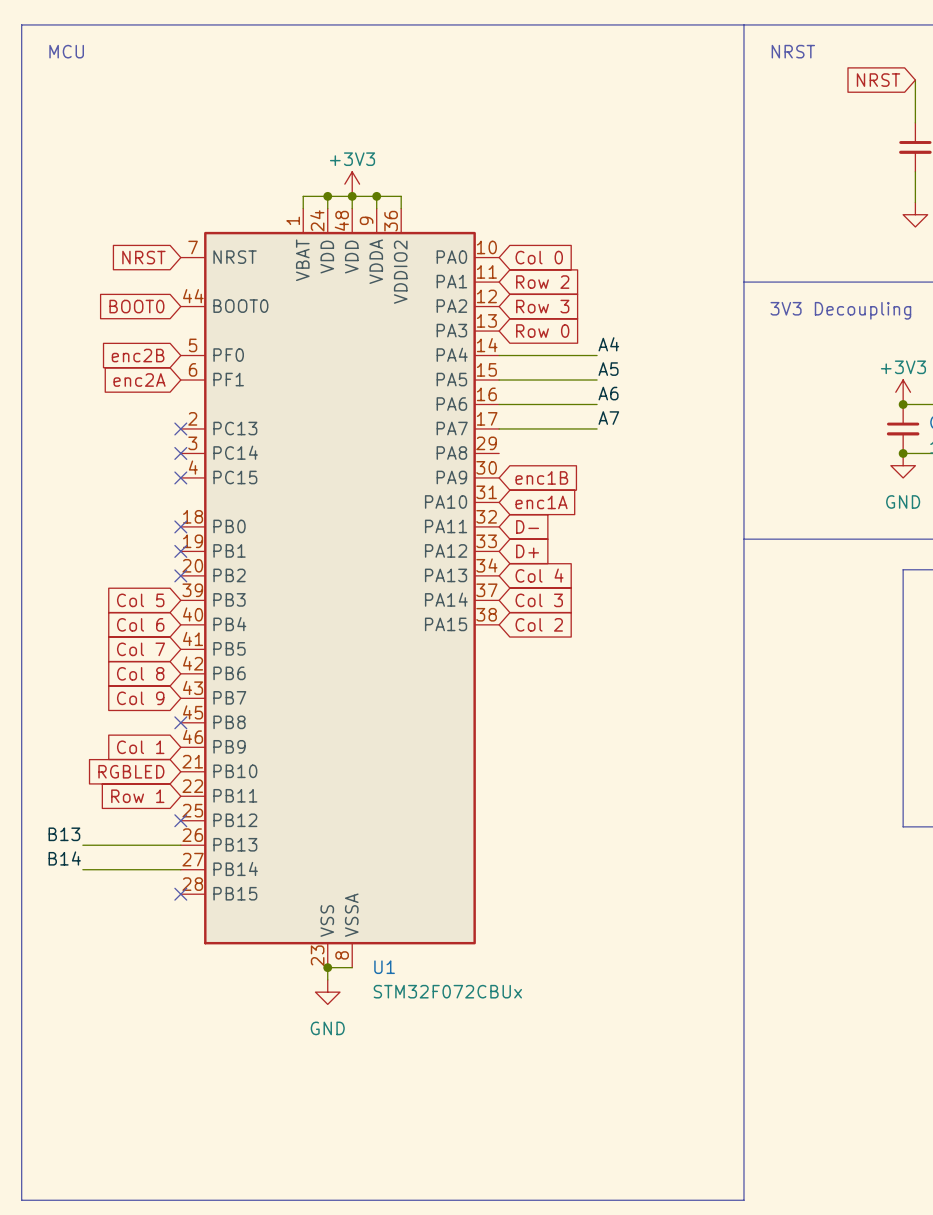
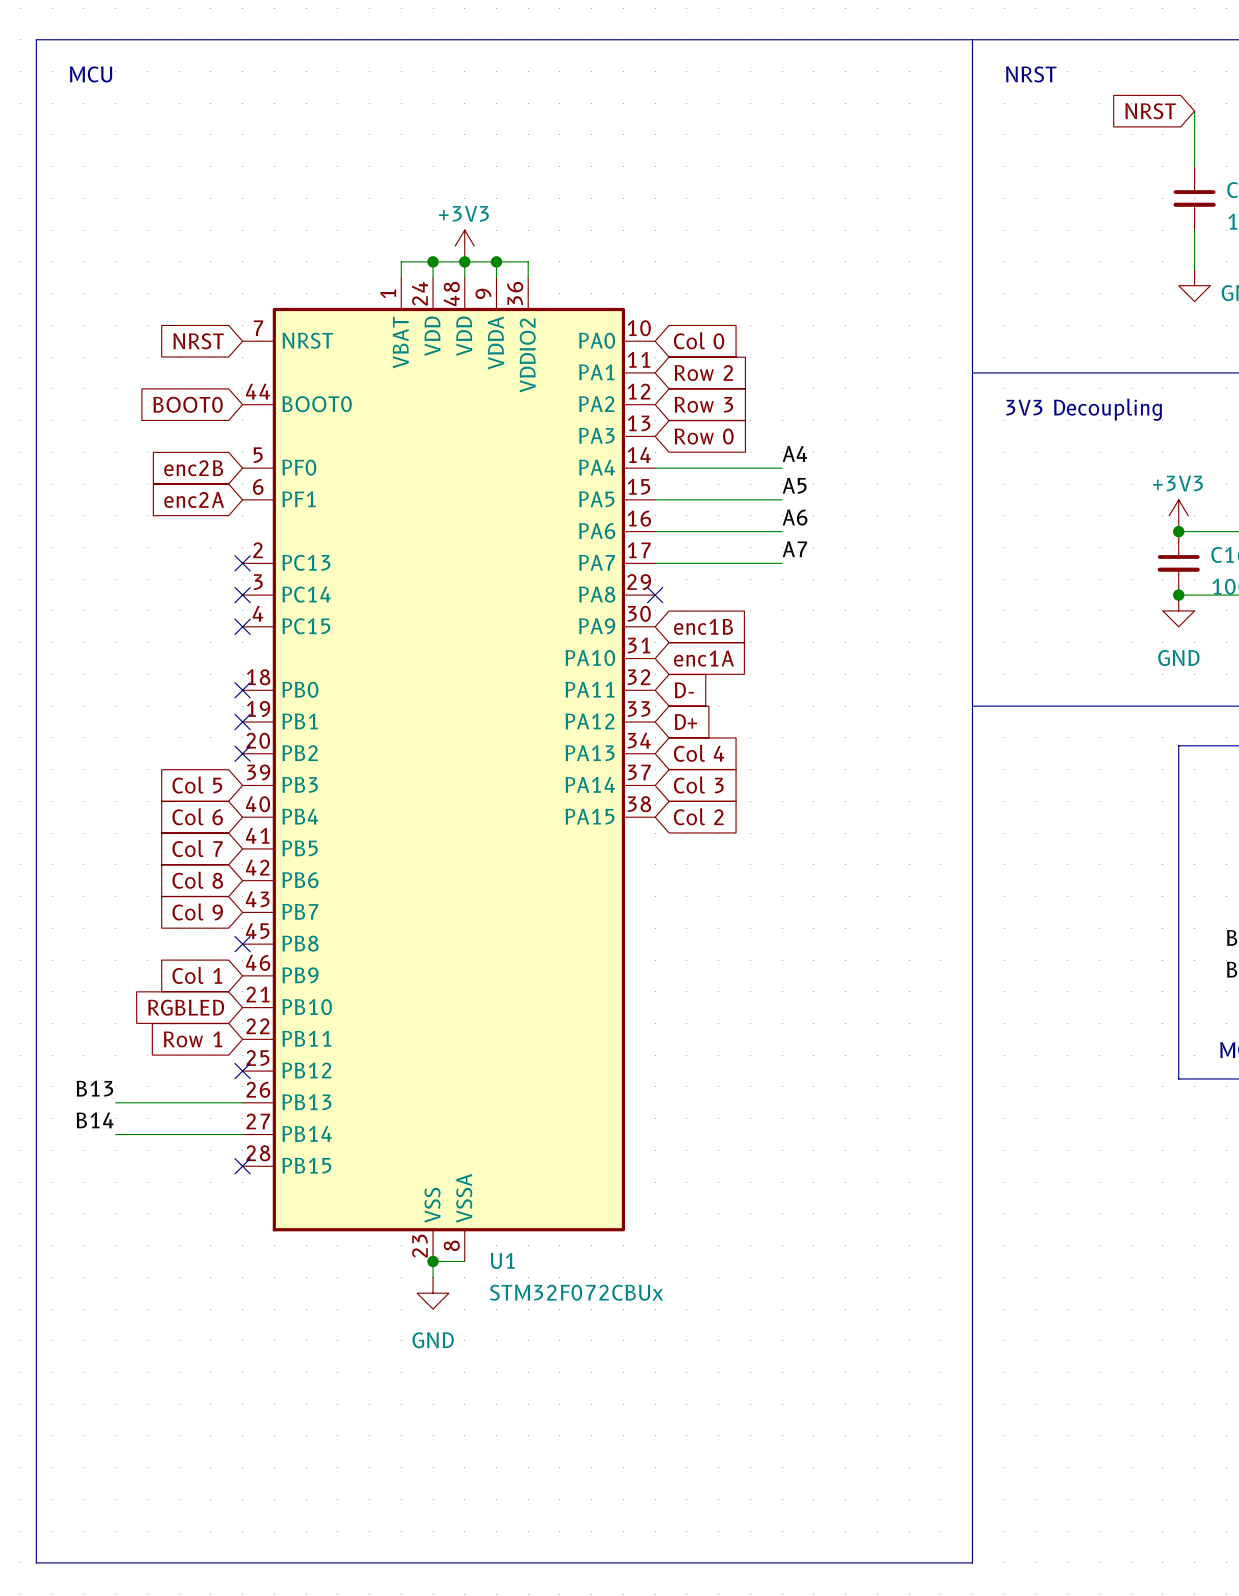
no-connect mark: none -> (655, 595)

